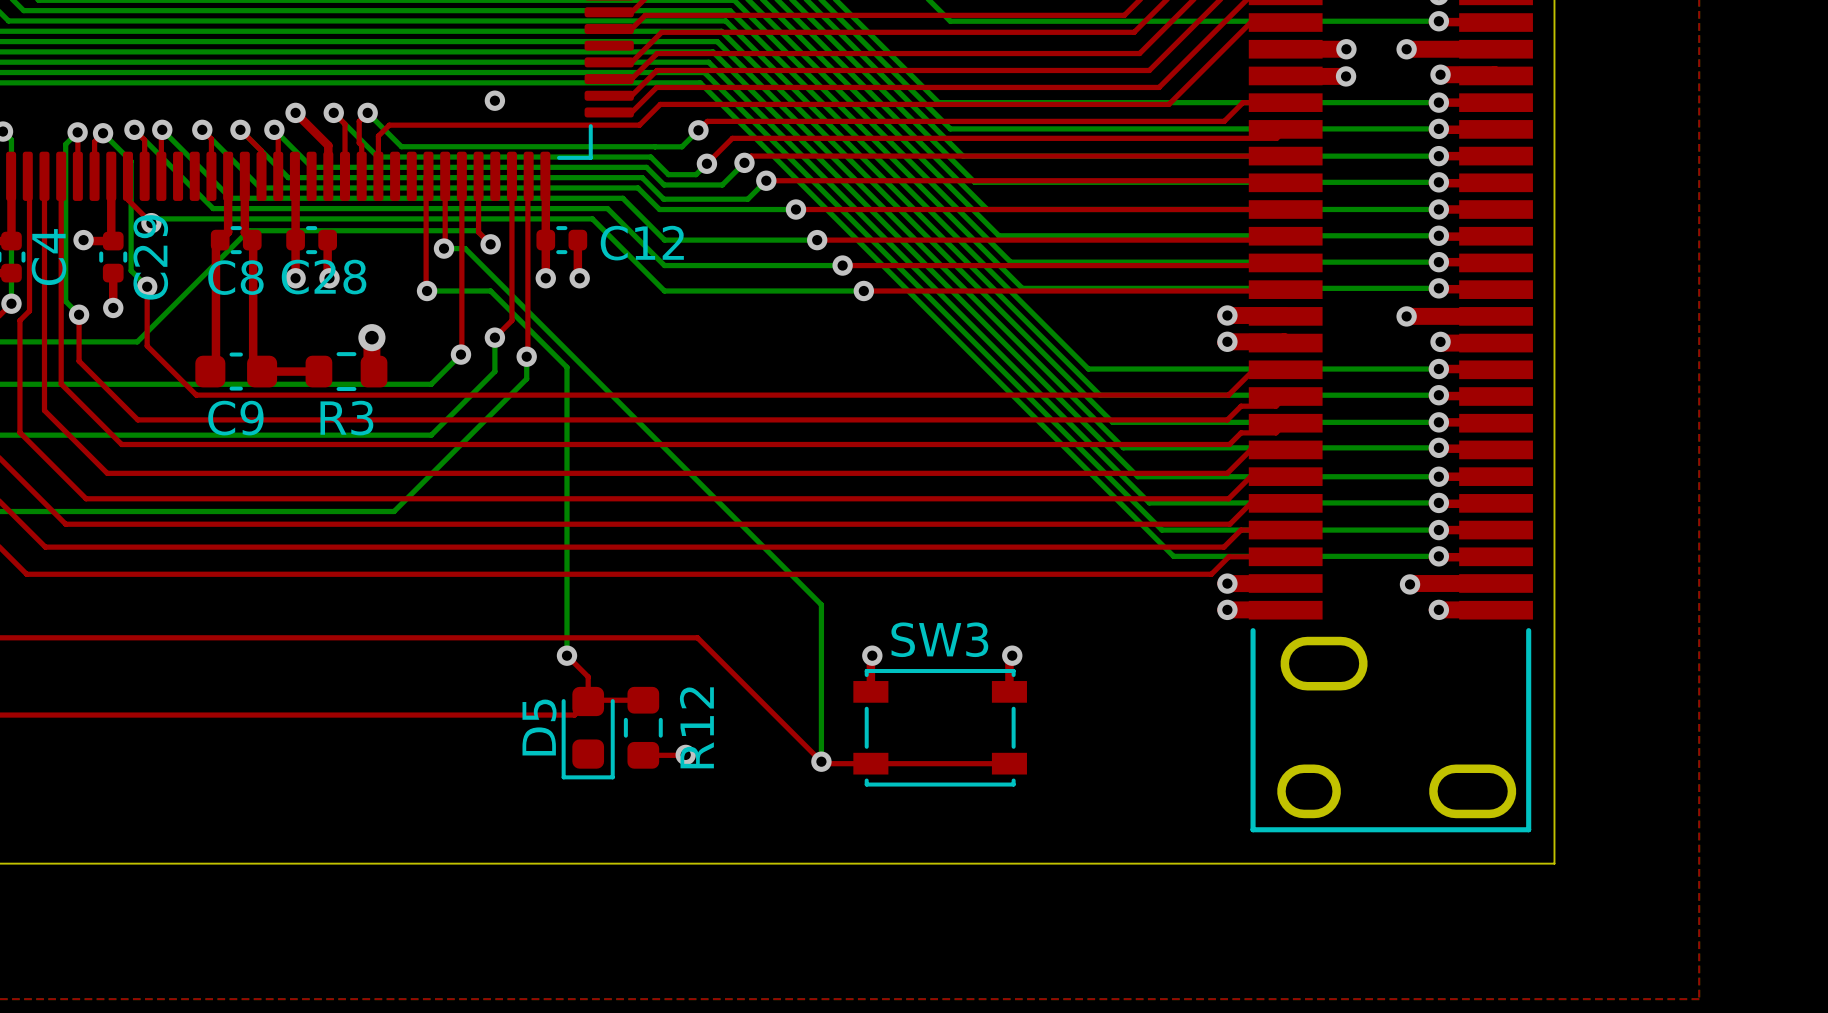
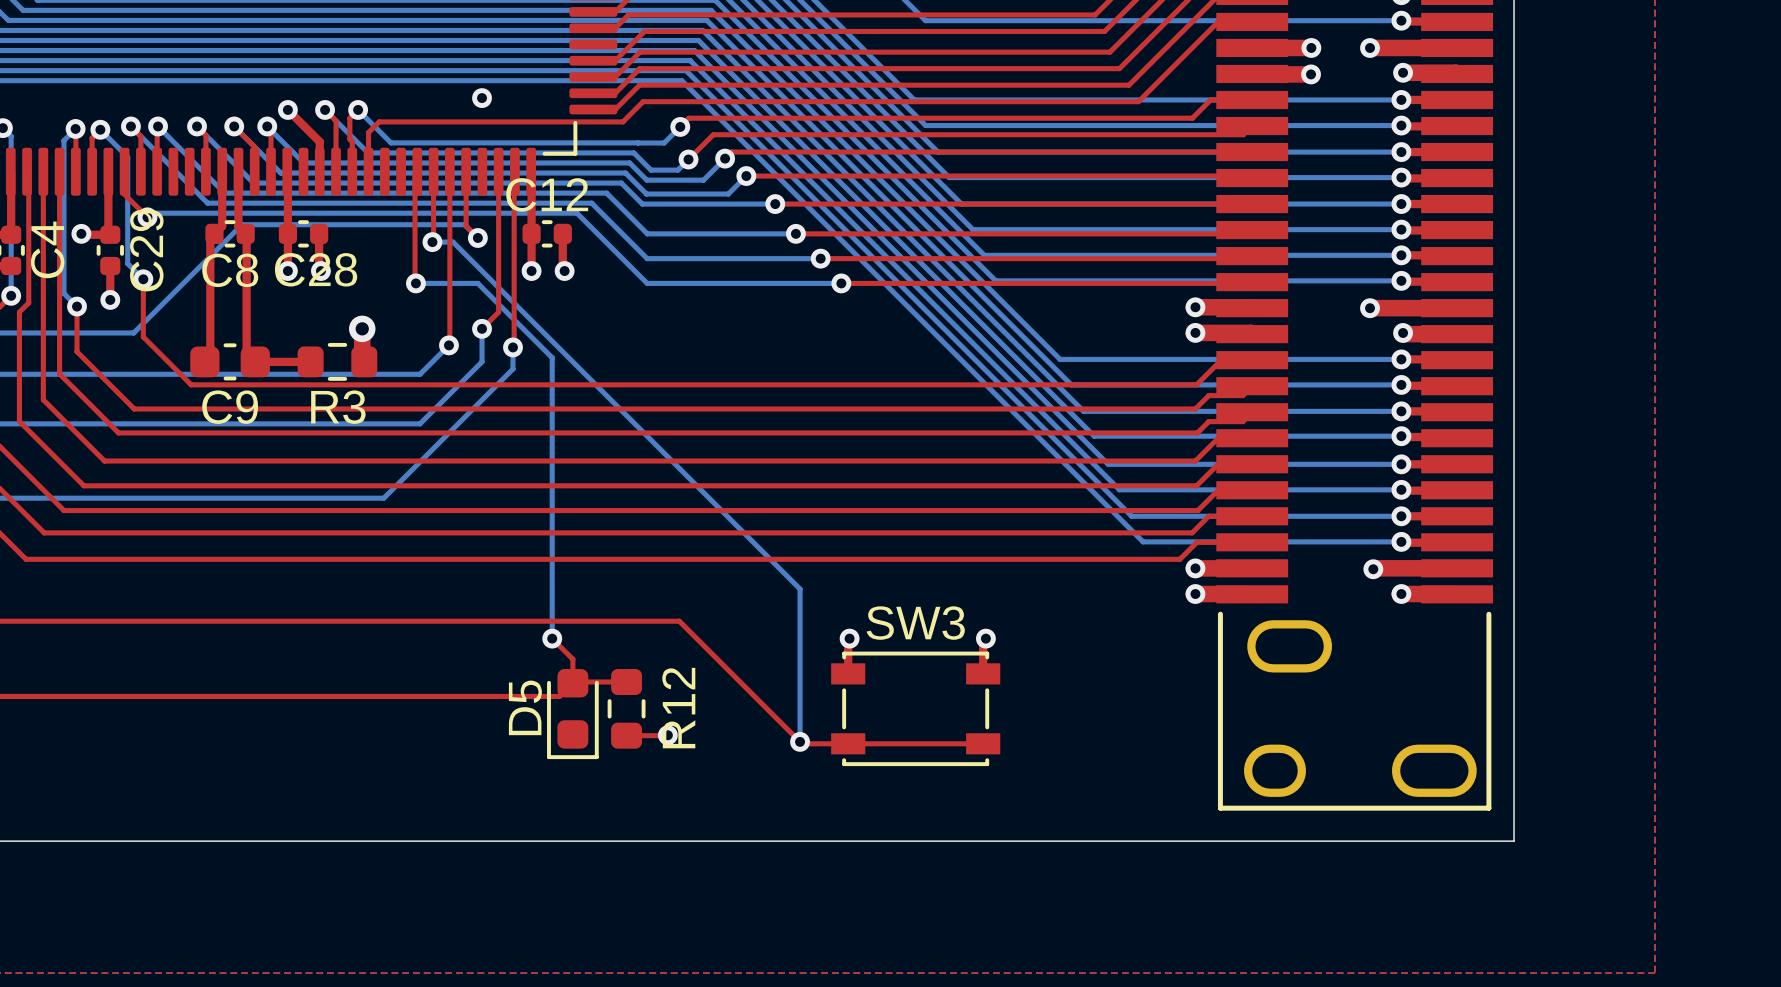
C12 name position: C12 (642, 243) -> C12 (547, 194)

